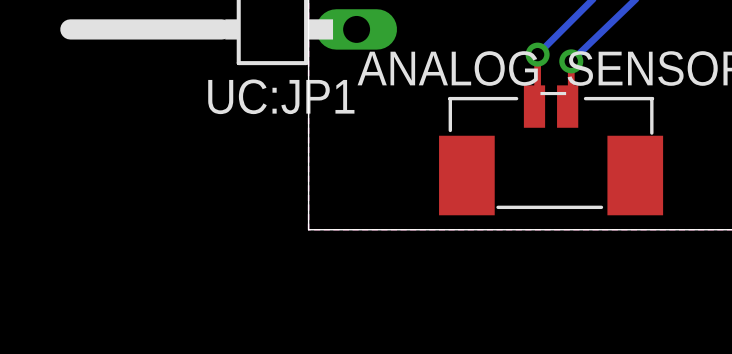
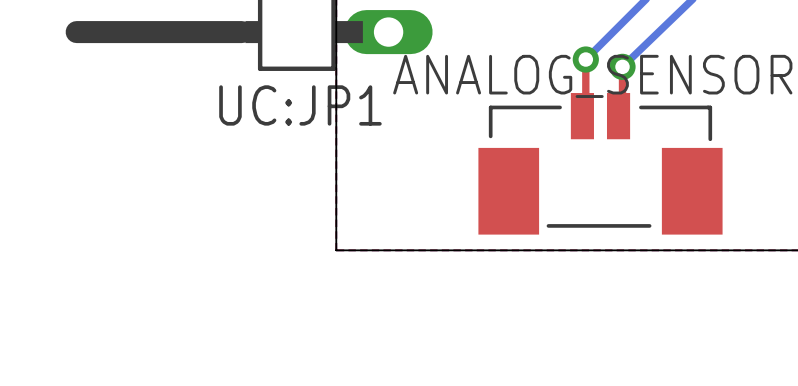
ANALOG_SENSOR footprint: [439, 85, 664, 216] -> [478, 93, 723, 235]

